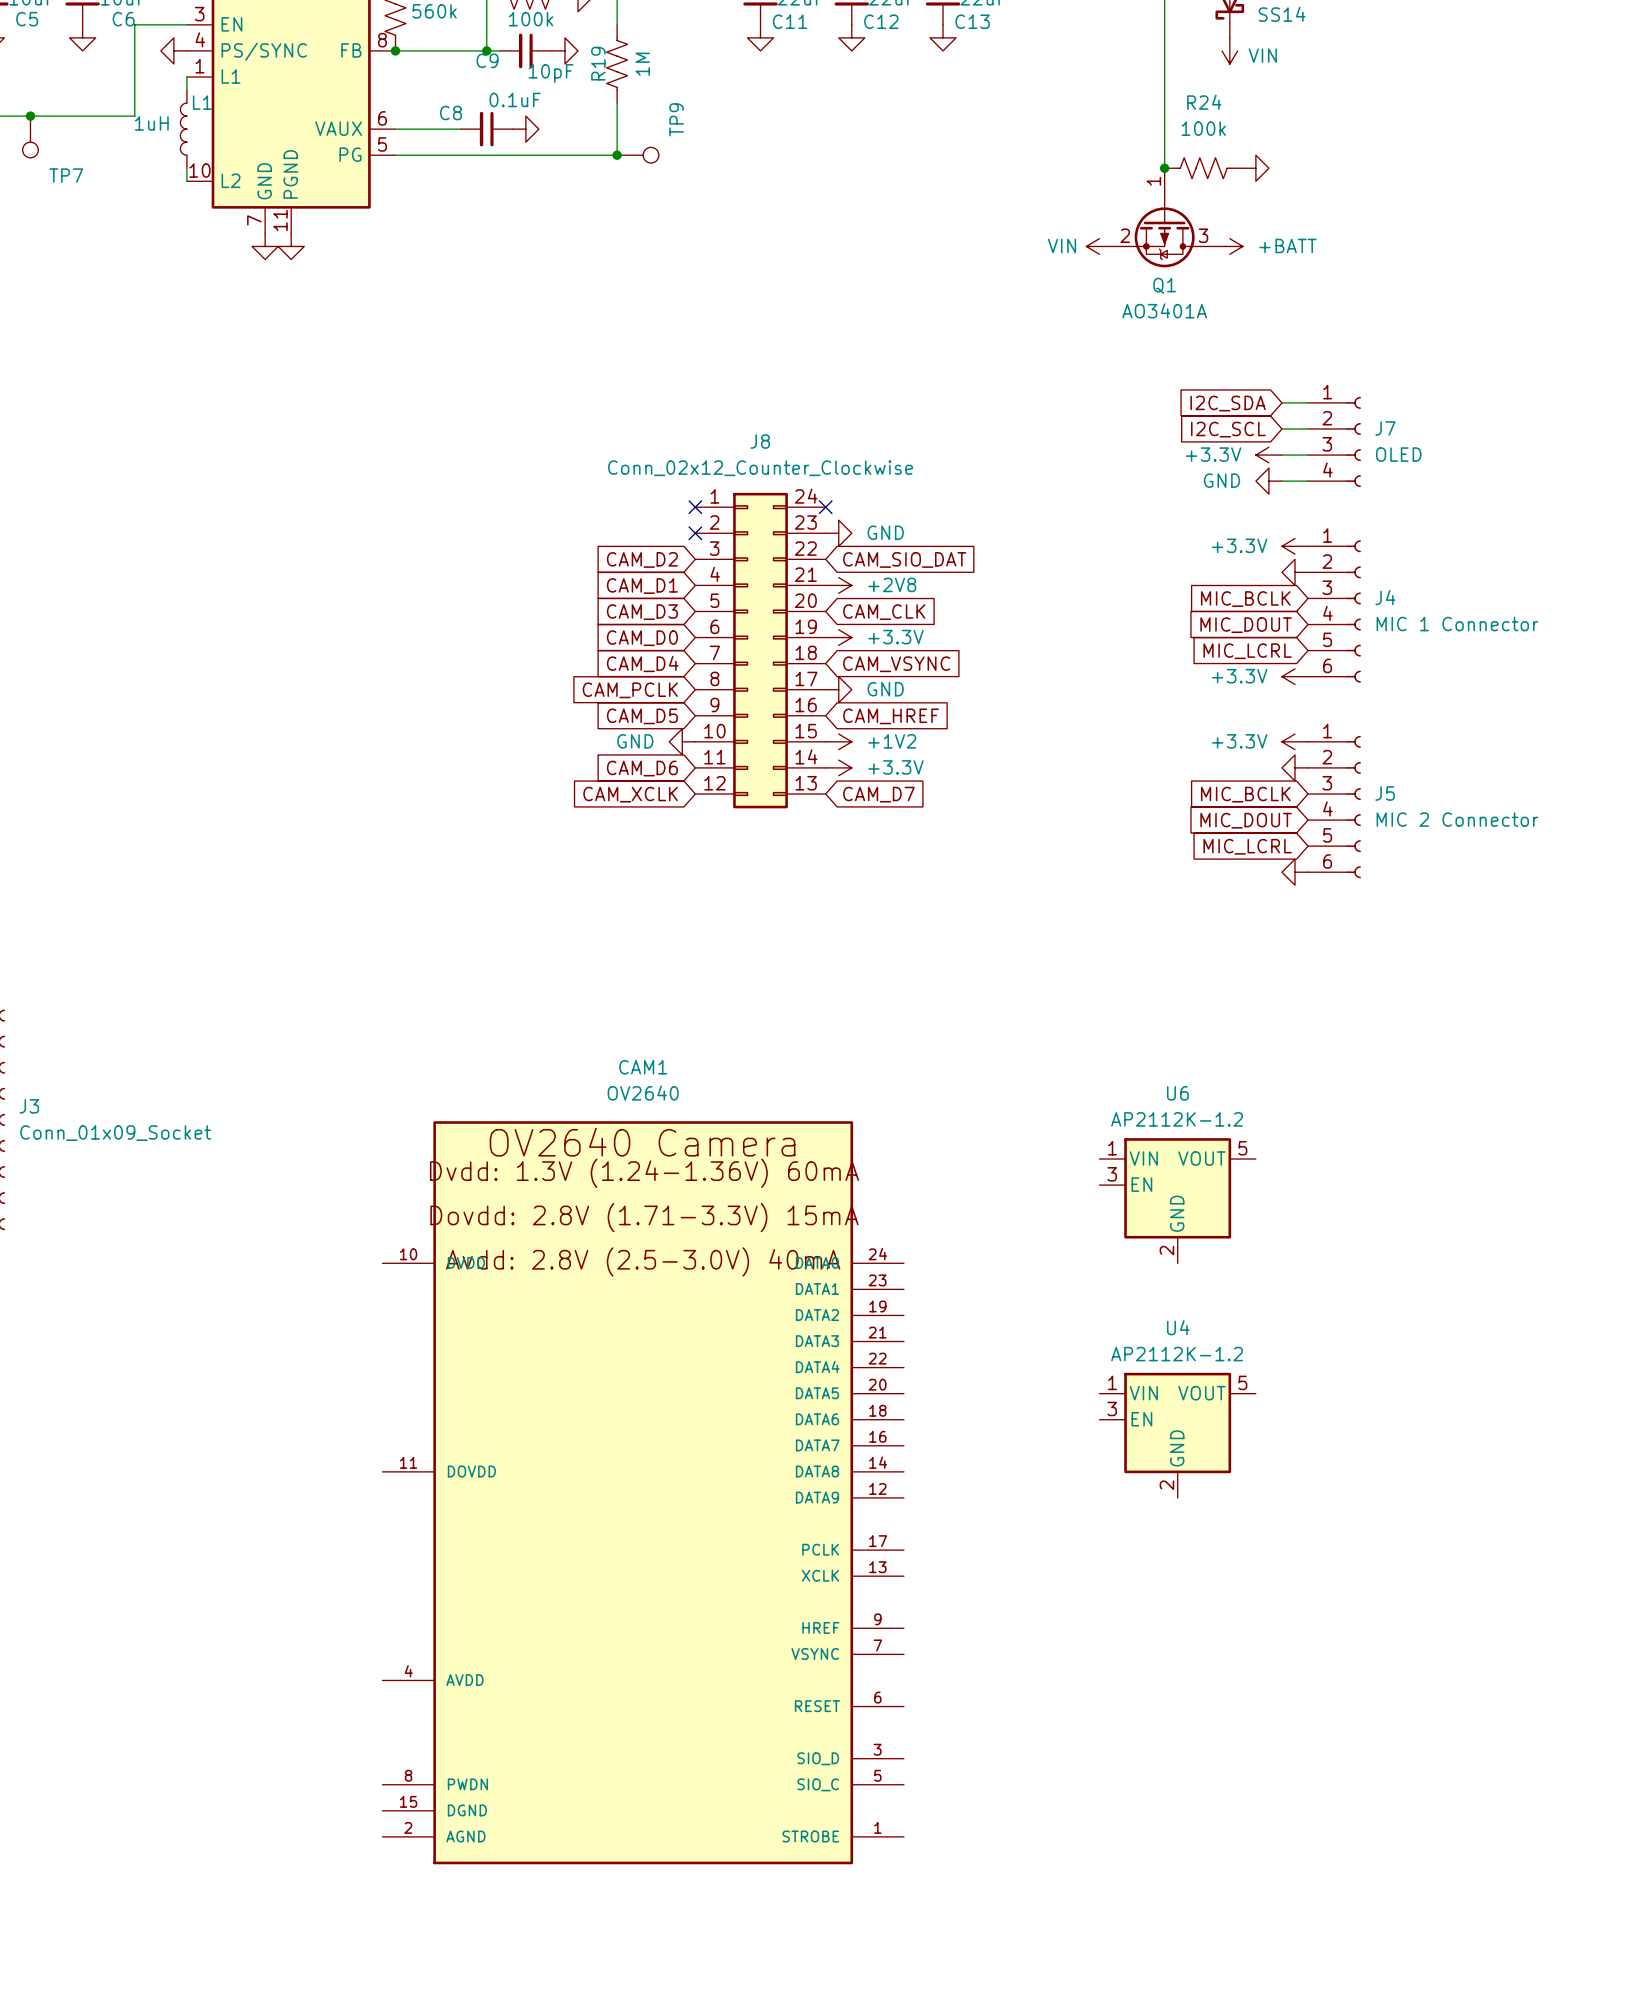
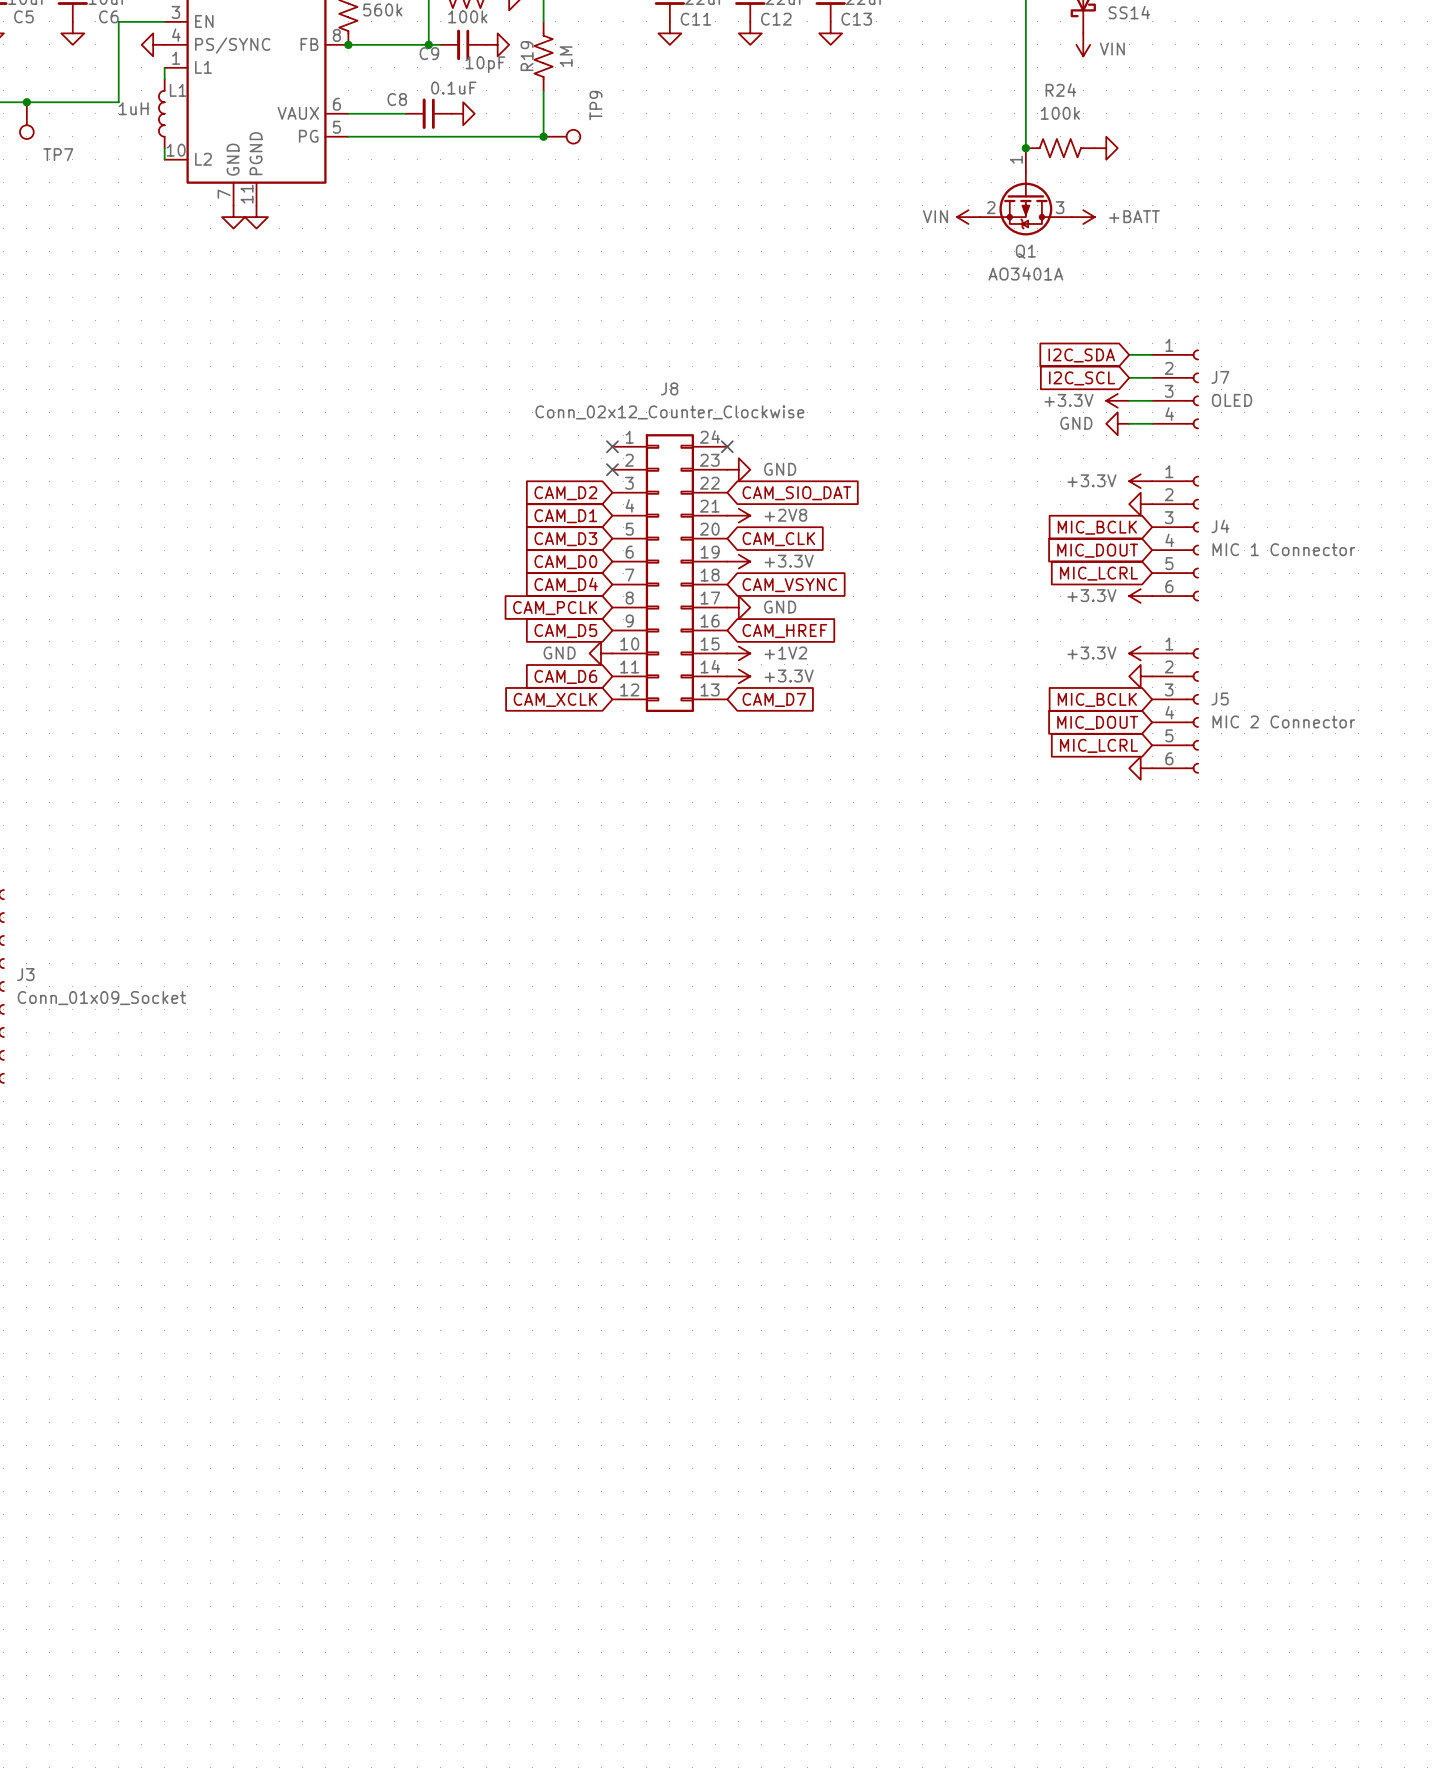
U6: AP2112K-1.2 (1177, 1200) -> none
U4: AP2112K-1.2 (1177, 1435) -> none
CAM1: OV2640 (643, 1492) -> none

